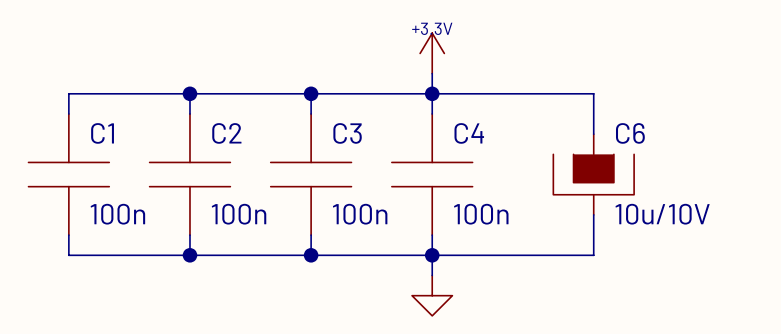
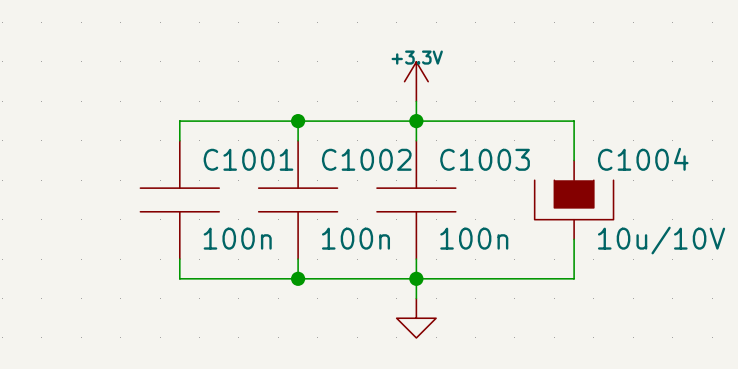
wire: (189, 93) (68, 93) (68, 114) -> none
junction: (189, 93) -> none
C2 name: C2 (226, 133) -> C1001 (248, 159)
C3 name: C3 (347, 133) -> C1002 (366, 159)
C4 name: C4 (469, 133) -> C1003 (485, 159)
C6 name: C6 (630, 133) -> C1004 (643, 159)
C1: 100n (68, 174) -> none
wire: (68, 235) (68, 255) (189, 255) -> none
junction: (189, 255) -> none

